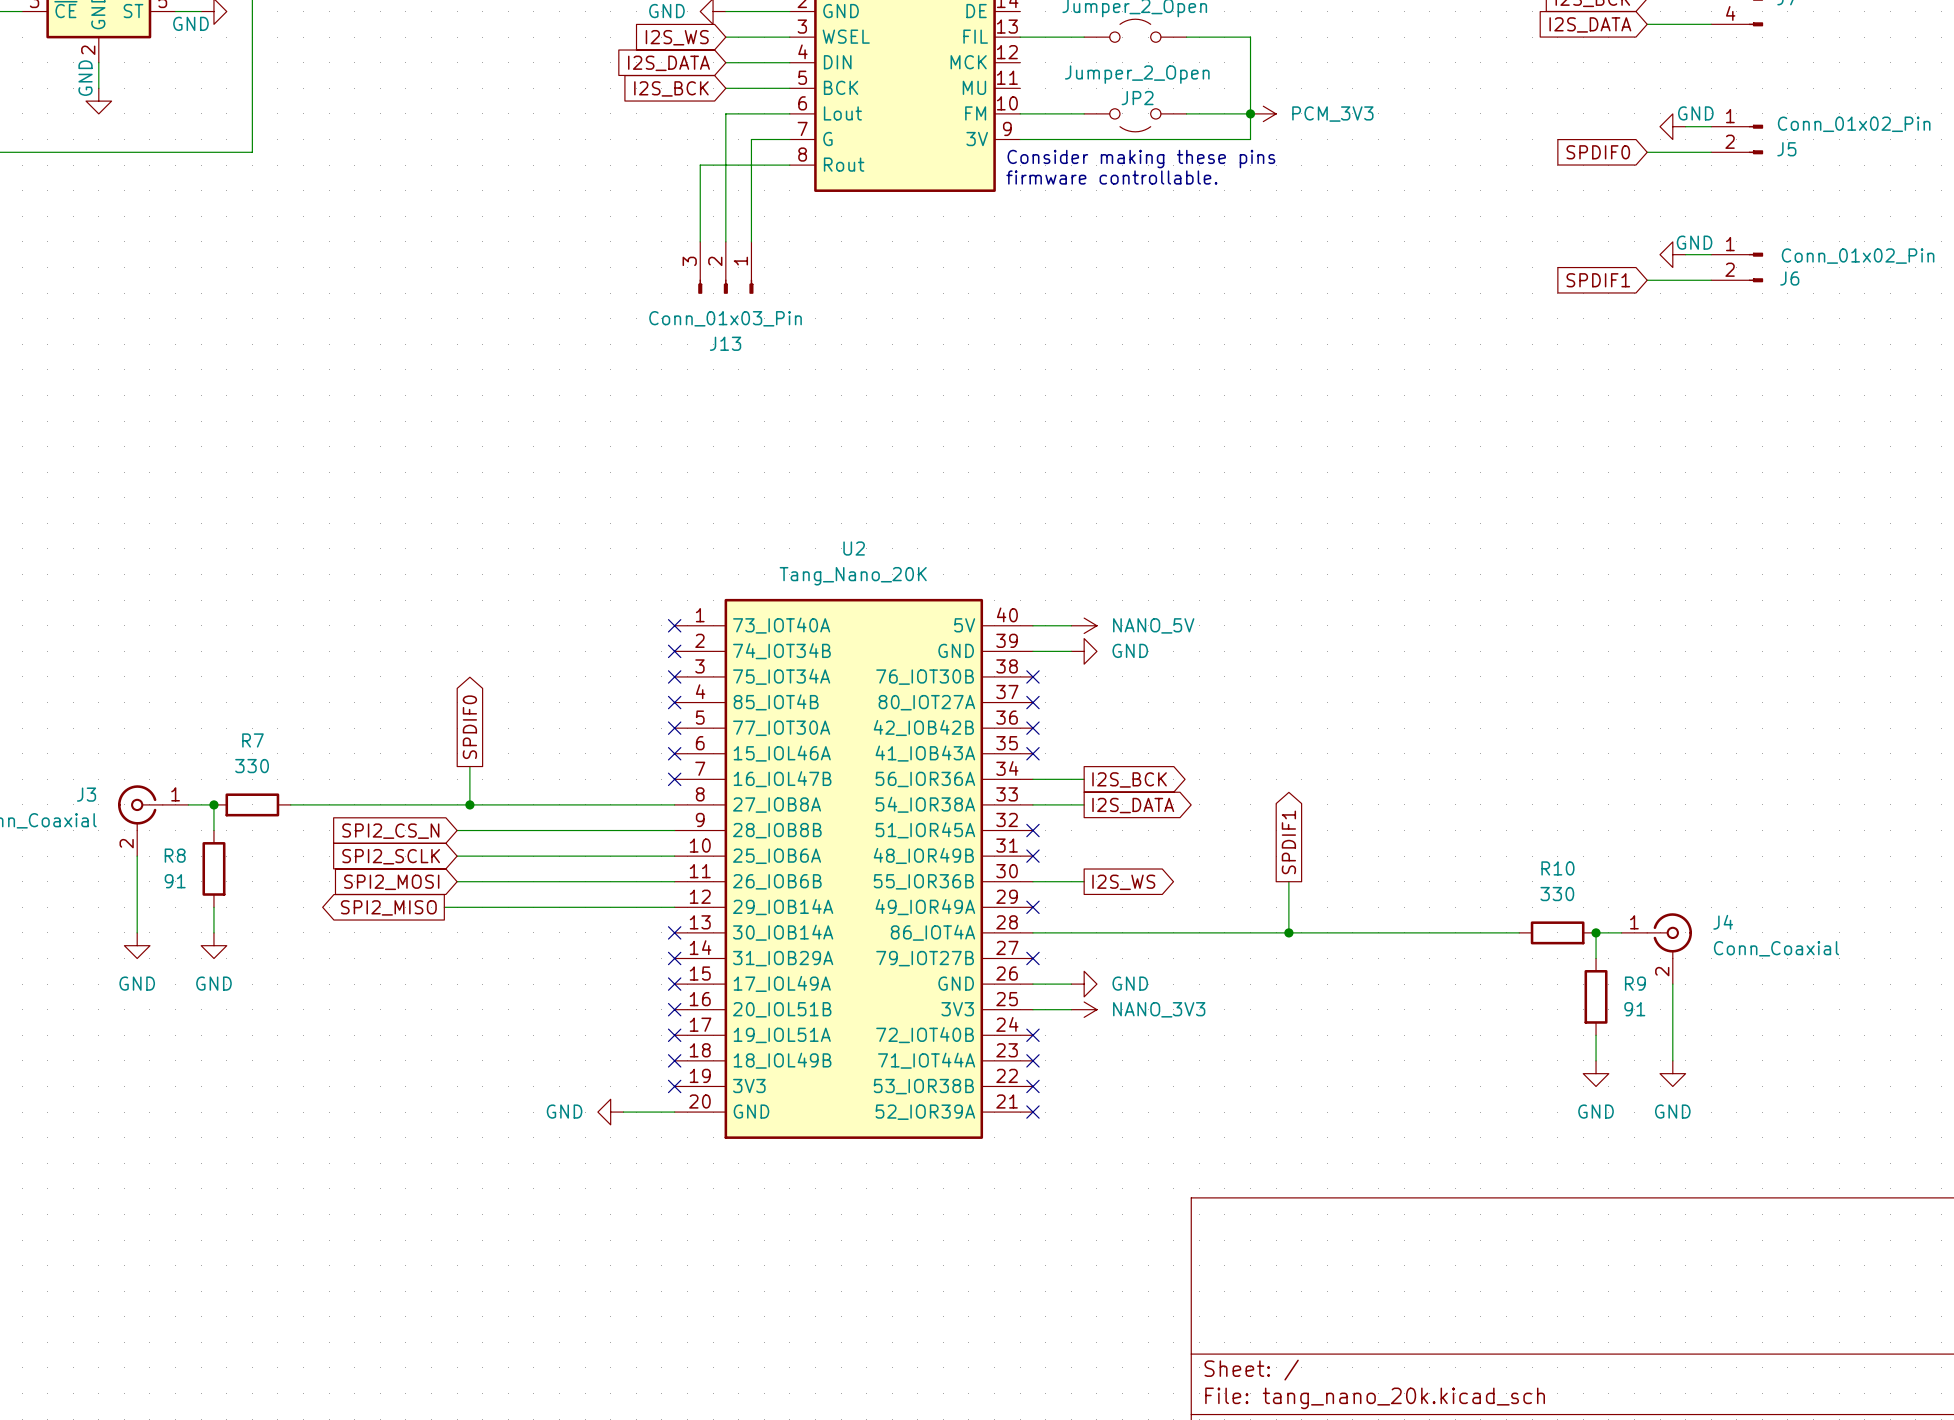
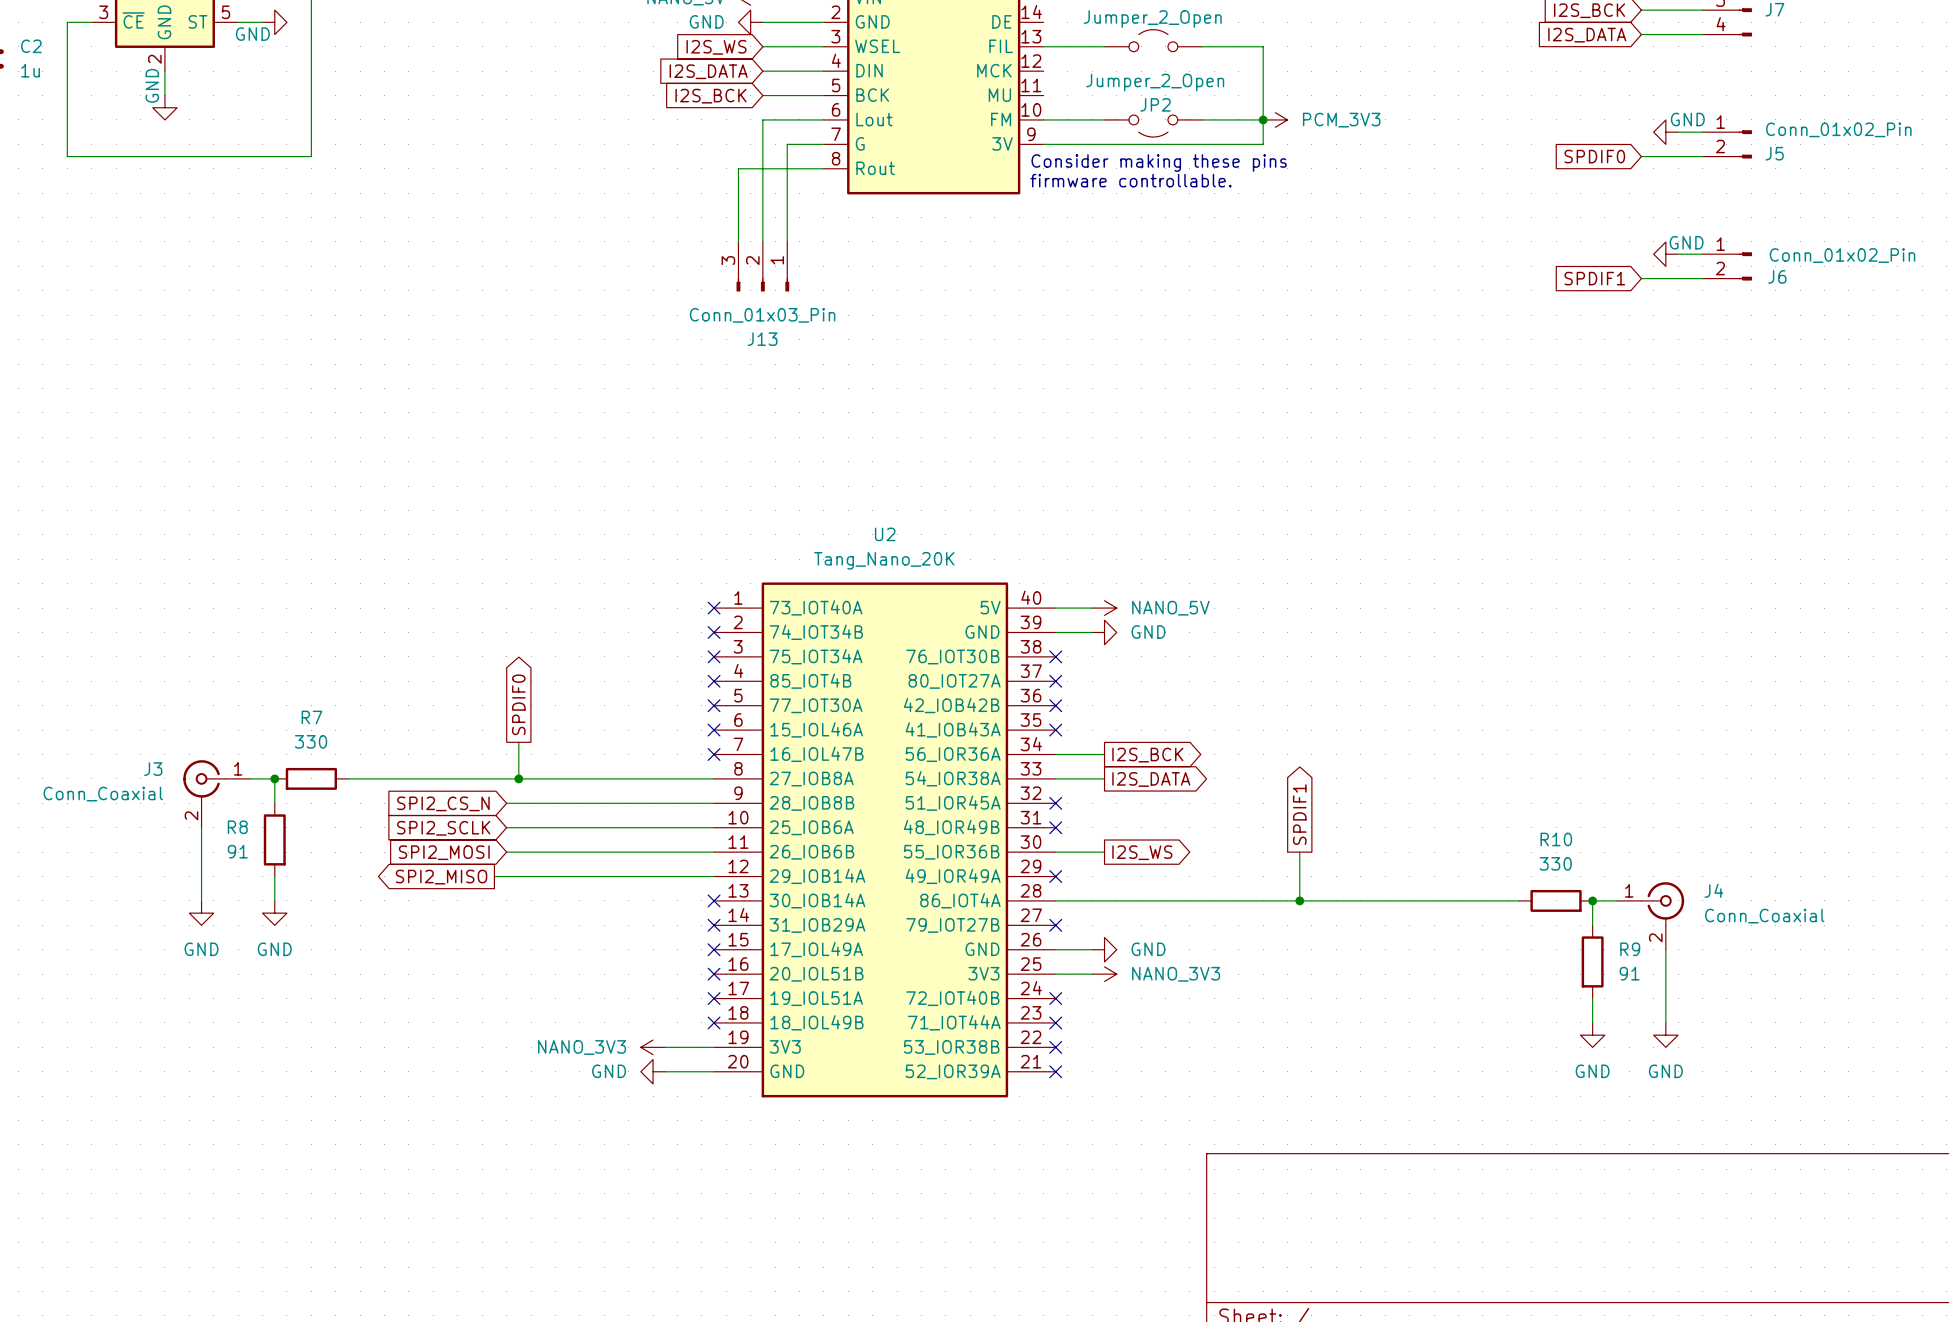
power symbol: none -> NANO_3V3 (653, 1047)
wire: none -> (665, 1047) (714, 1047)
no-connect mark: (674, 1086) -> none

